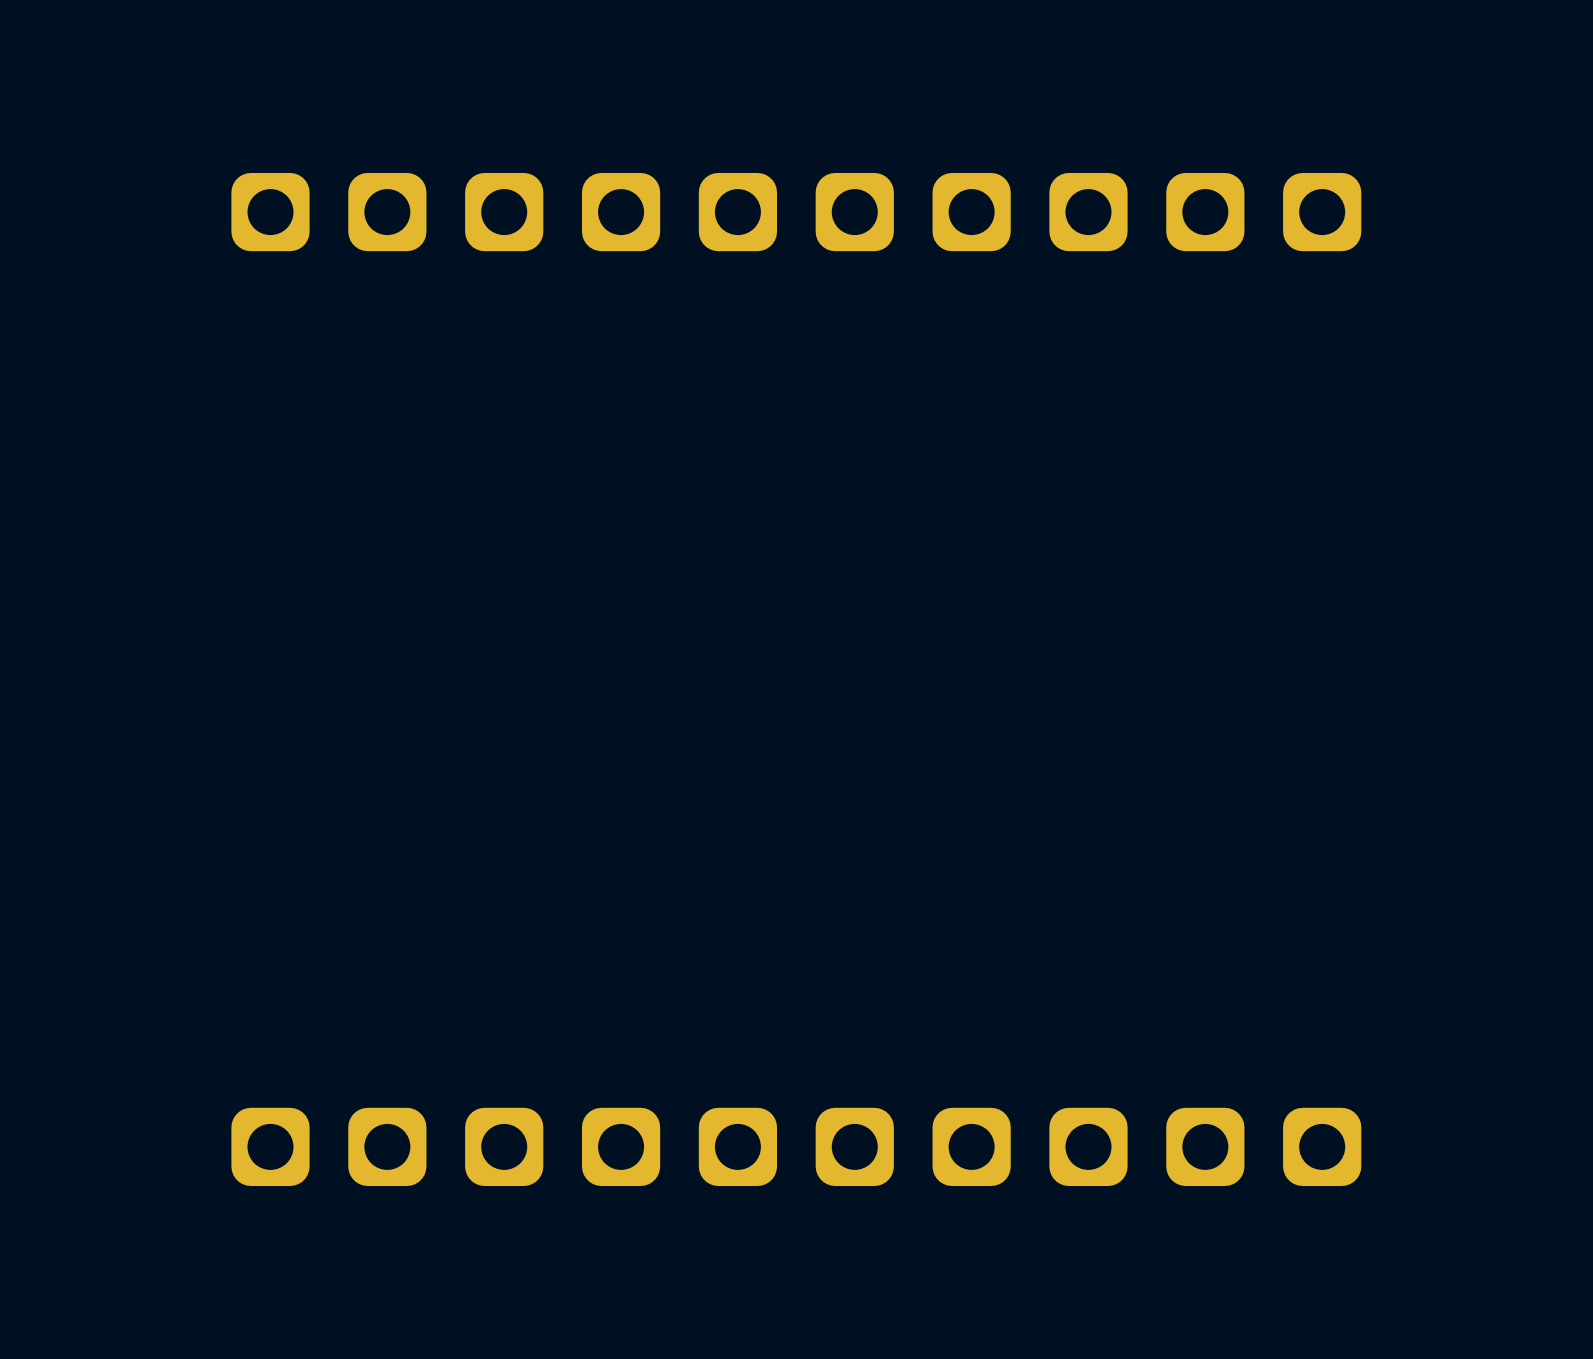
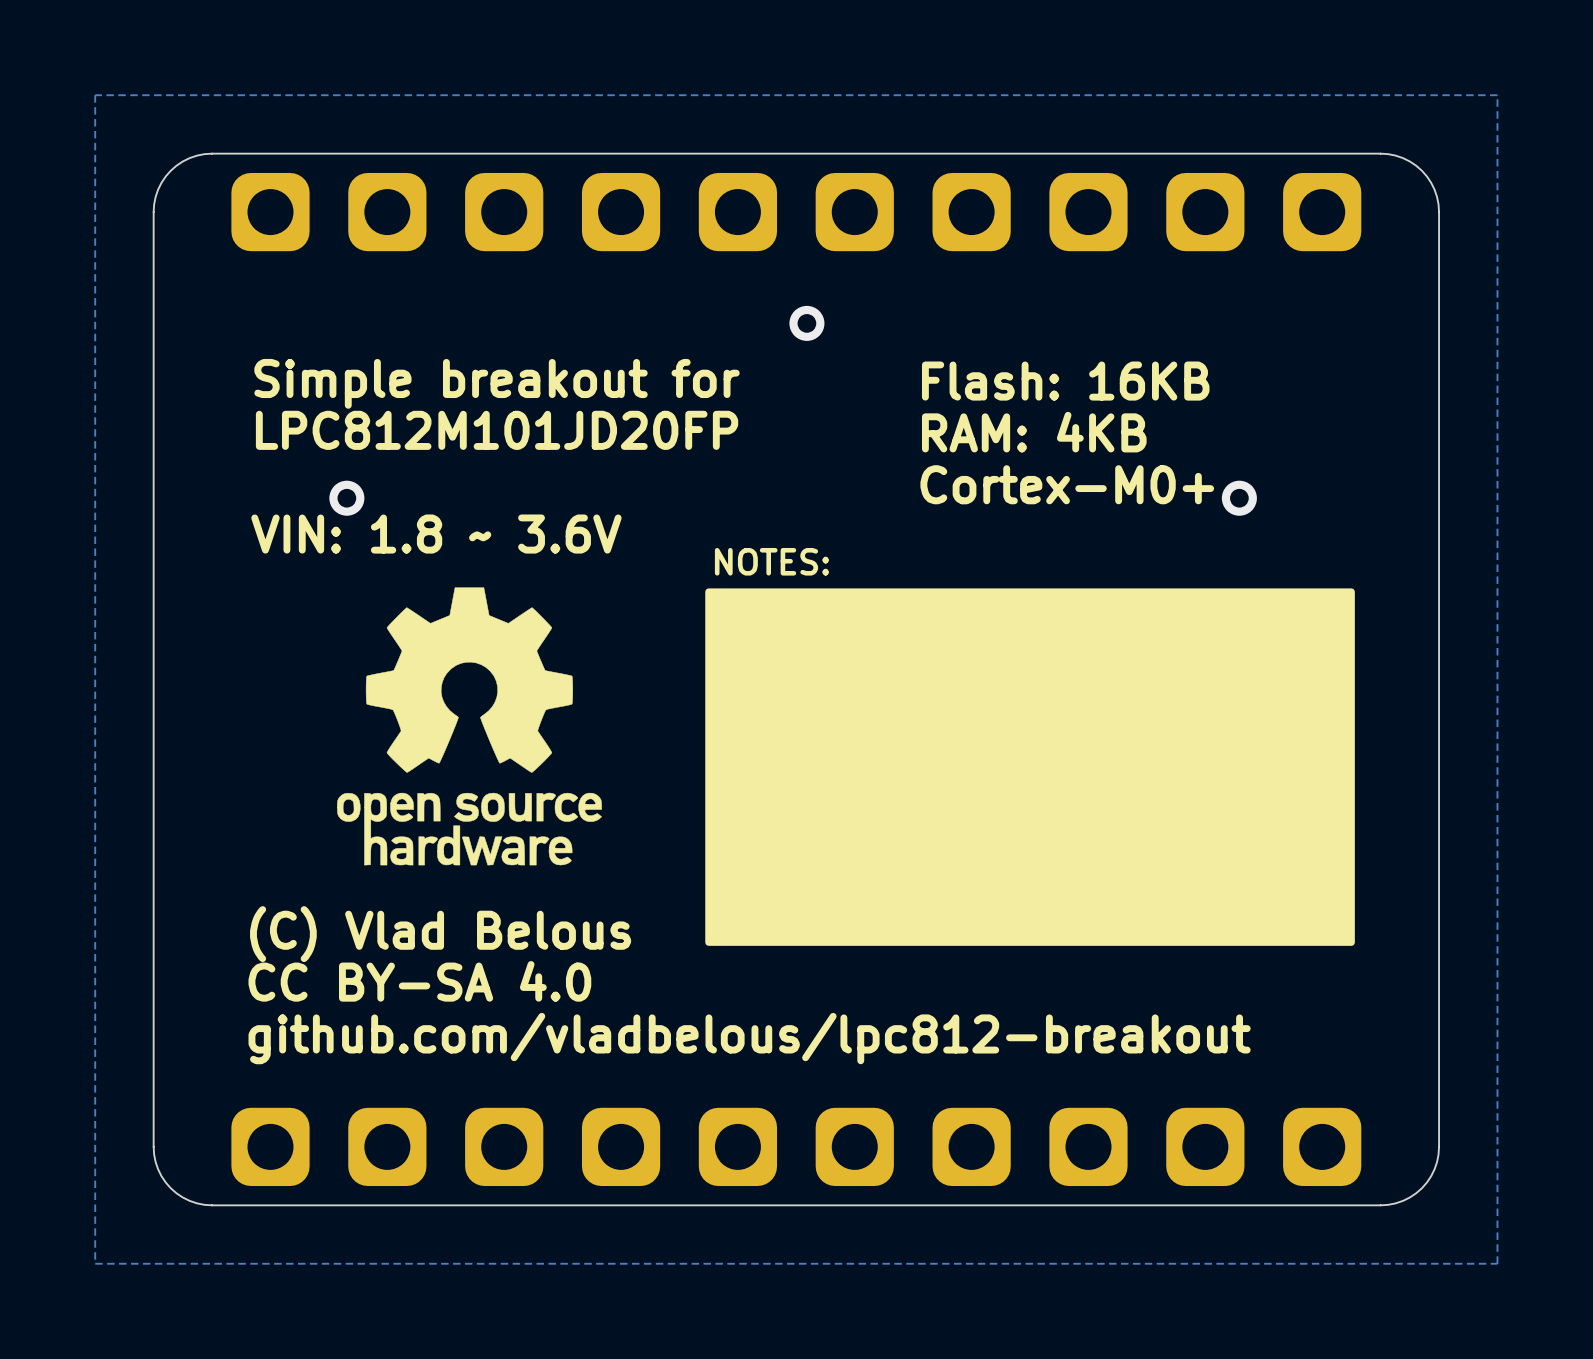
zone outline: none -> (1497, 95) (95, 95) (95, 1263) (1497, 1263) (1497, 95)
board edge: none -> (1380, 153) (212, 153) (196, 155) (176, 165) (165, 176) (158, 189) (153, 212) (153, 1146) (155, 1162) (165, 1182) (182, 1197) (196, 1203) (212, 1205) (1380, 1205) (1395, 1203) (1416, 1193) (1431, 1176) (1437, 1162) (1439, 1146) (1439, 212) (1434, 189) (1421, 170) (1402, 158) (1380, 153)
via: none -> (806, 323)
text: none -> Flash: 16KB (1065, 381)
text: none -> Simple breakout for (497, 383)
text: none -> LPC812M101JD20FP (497, 430)
text: none -> RAM: 4KB (1034, 432)
text: none -> Cortex-M0+ (1067, 484)
via: none -> (346, 498)
via: none -> (1239, 498)
text: none -> VIN: 1.8 ~ 3.6V (436, 534)
text: none -> NOTES: (771, 561)
drawing: none -> [337, 587, 602, 866]
drawing: none -> [705, 588, 1355, 946]
text: none -> (C) Vlad Belous (440, 934)
text: none -> CC BY-SA 4.0 (419, 981)
text: none -> github.com/vladbelous/lpc812-breakout (749, 1038)

